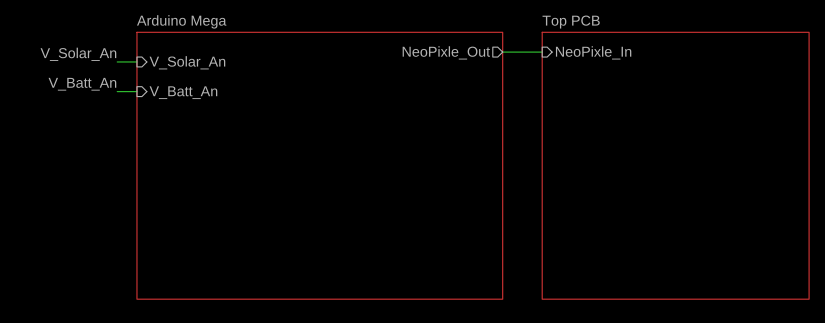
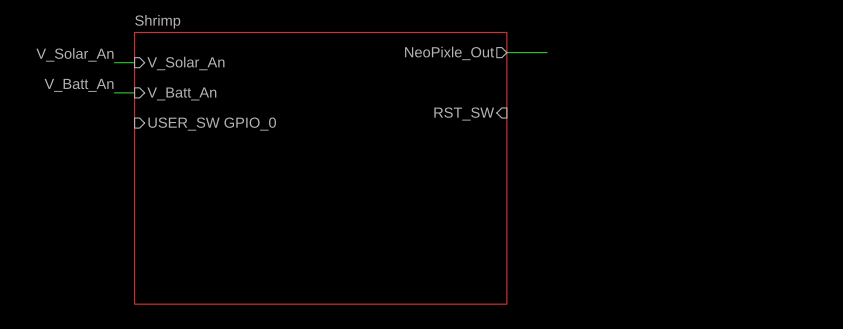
sheet Arduino Mega name: Arduino Mega (181, 21) -> Shrimp (157, 21)
sheet pin: NeoPixle_In (593, 52) -> none
sheet pin: none -> RST_SW (464, 114)
sheet pin: none -> USER_SW GPIO_0 (212, 124)
sheet Top PCB: (675, 165) -> none

